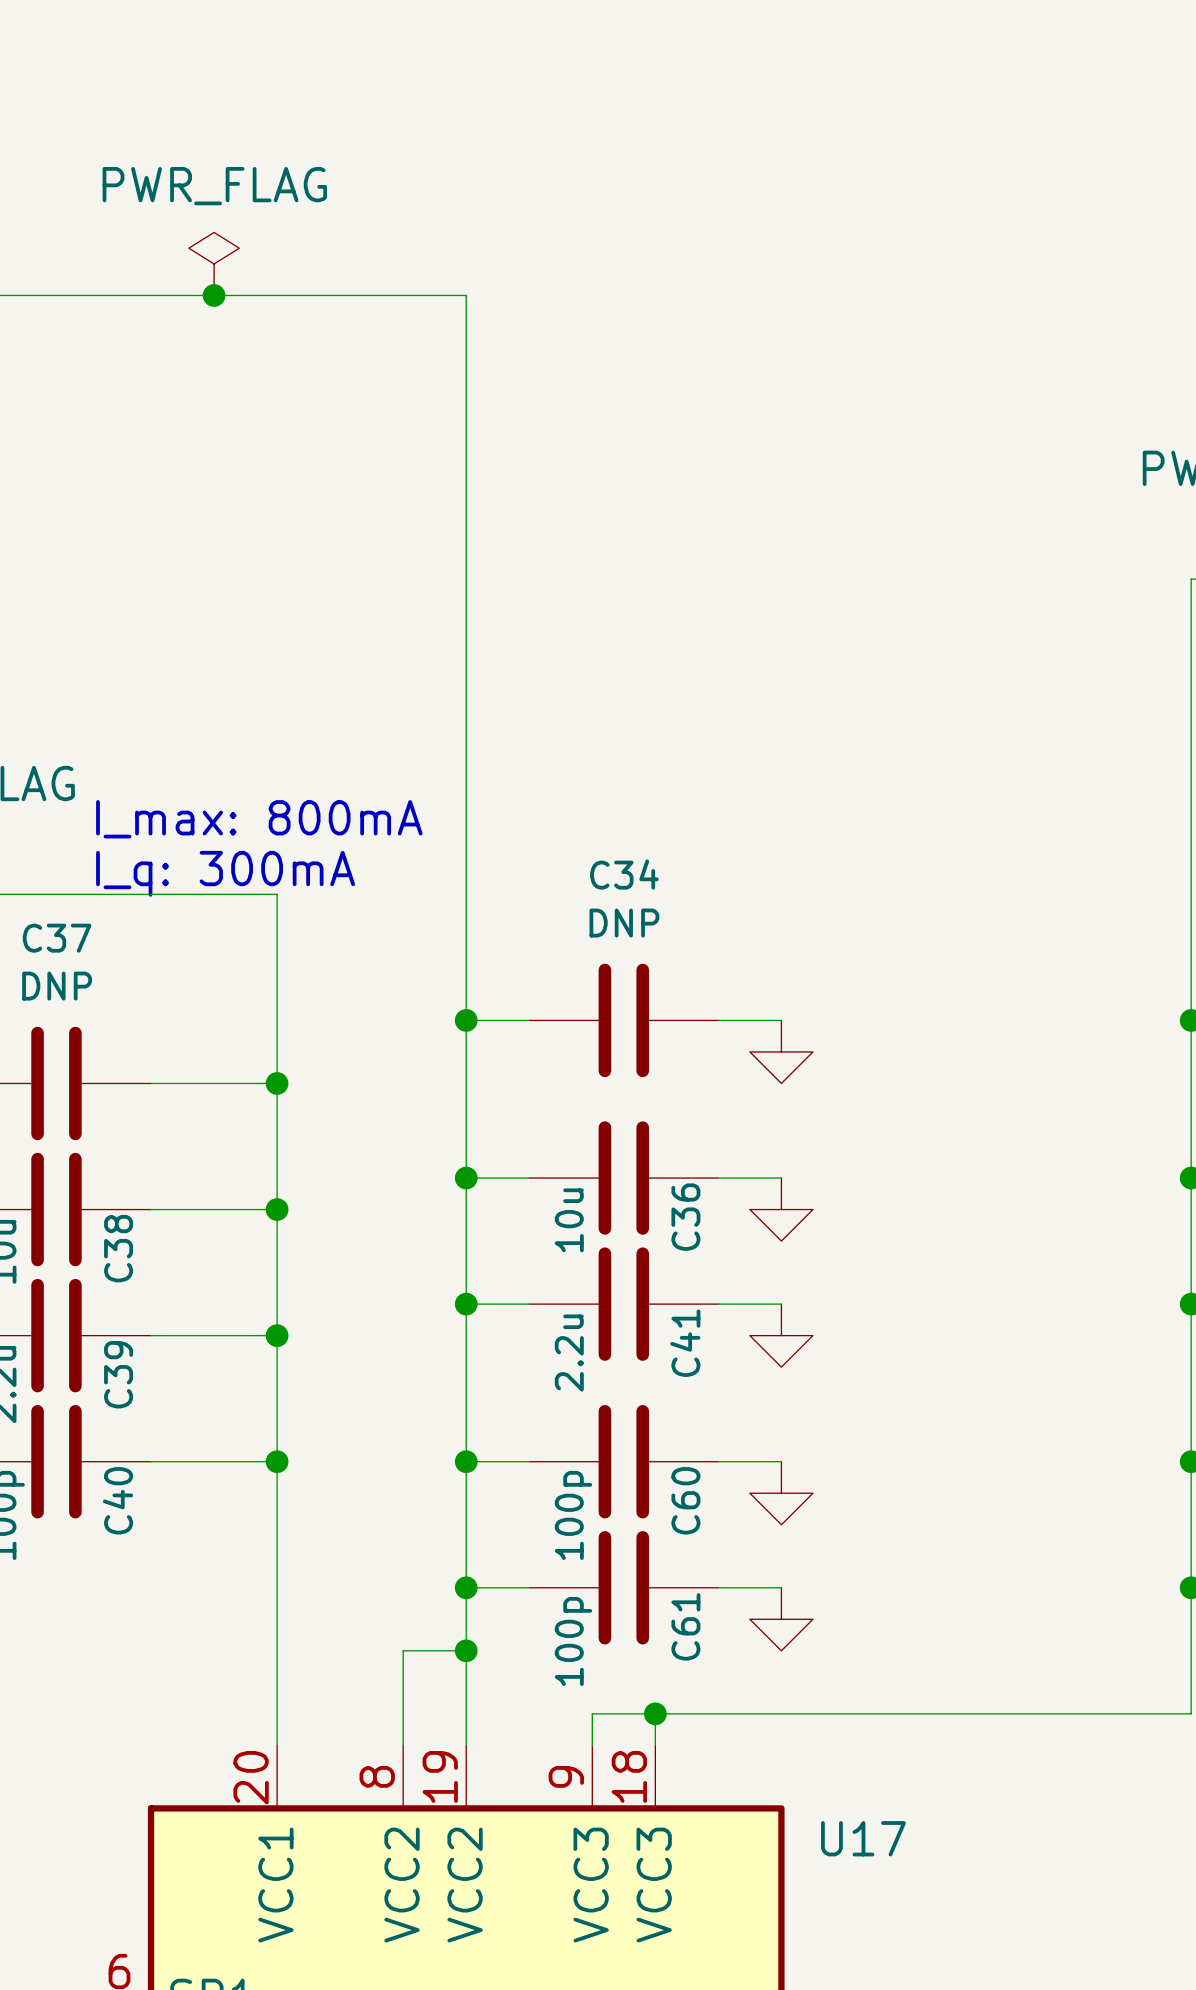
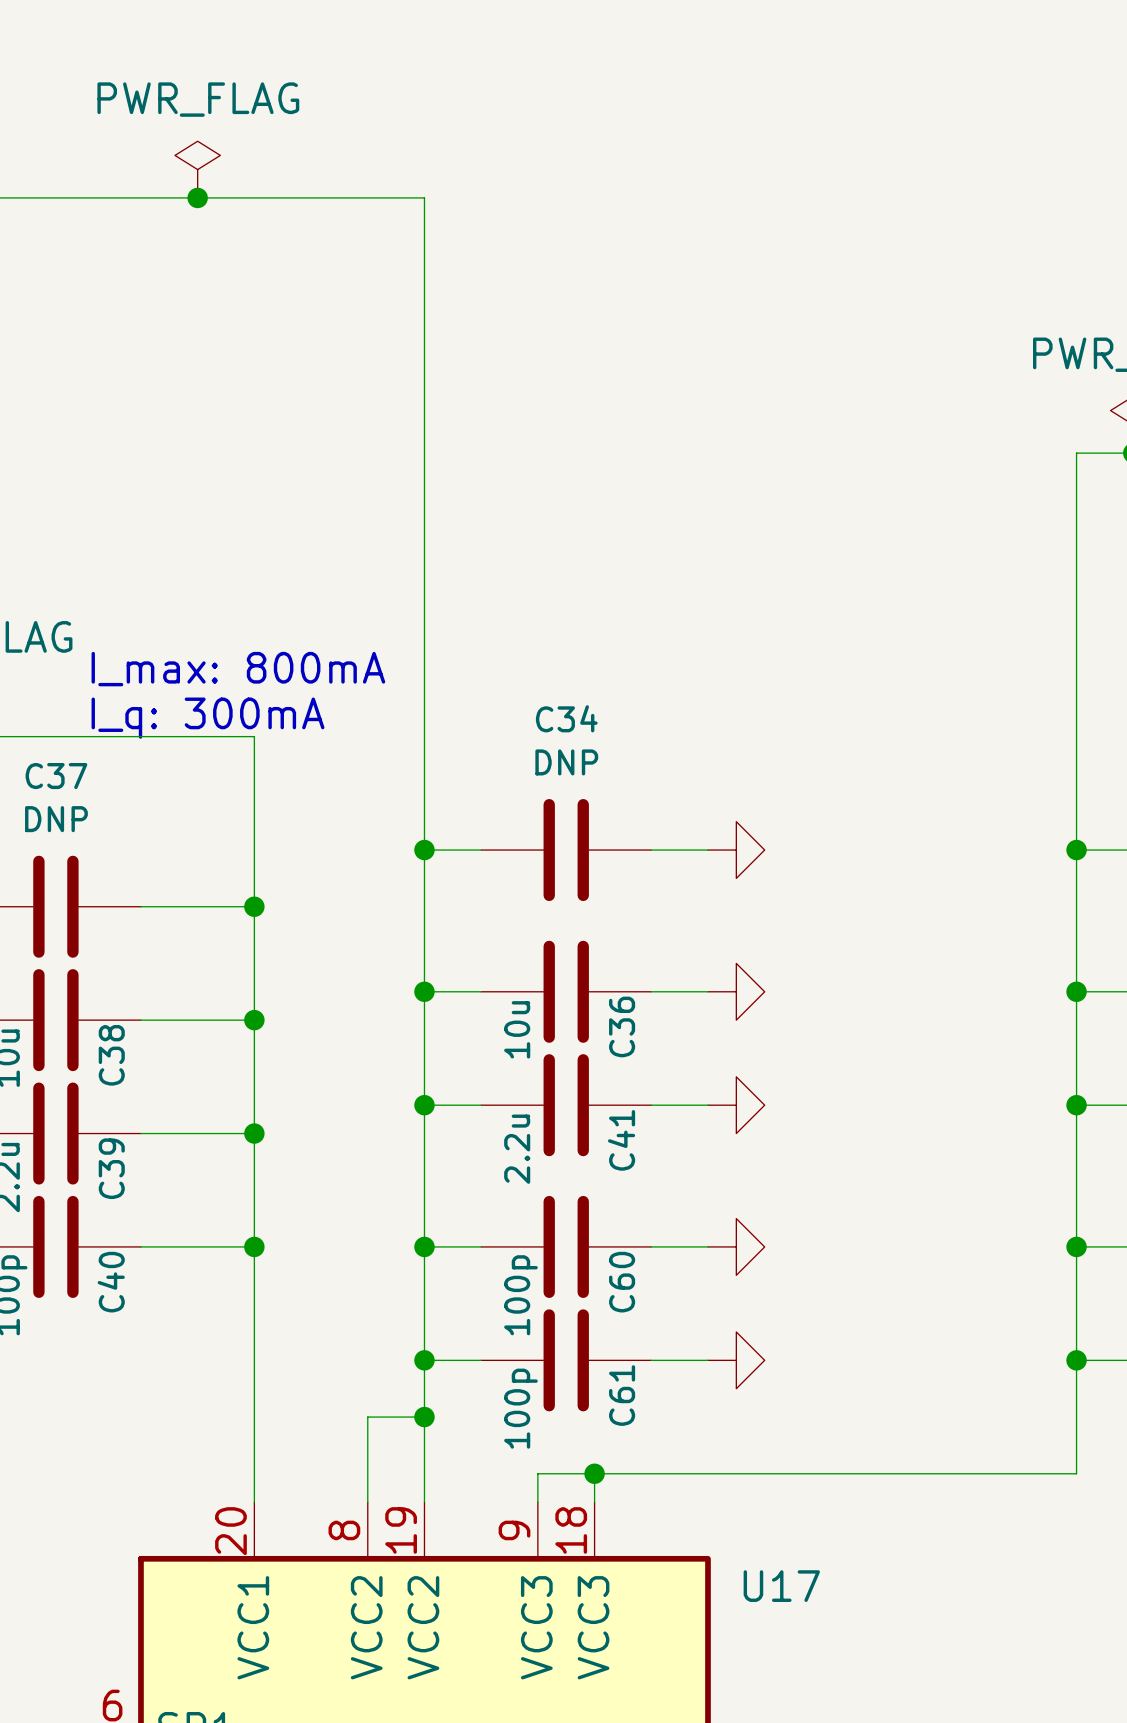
power symbol rotation: 0° (781, 1051) -> 90° counterclockwise (736, 850)
power symbol position: (781, 1051) -> (736, 850)
power symbol rotation: 0° (781, 1209) -> 90° counterclockwise (736, 991)
power symbol position: (781, 1209) -> (736, 991)
power symbol rotation: 0° (781, 1335) -> 90° counterclockwise (736, 1105)
power symbol position: (781, 1335) -> (736, 1105)
power symbol rotation: 0° (781, 1493) -> 90° counterclockwise (736, 1246)
power symbol position: (781, 1493) -> (736, 1246)
power symbol rotation: 0° (781, 1619) -> 90° counterclockwise (736, 1360)
power symbol position: (781, 1619) -> (736, 1360)

